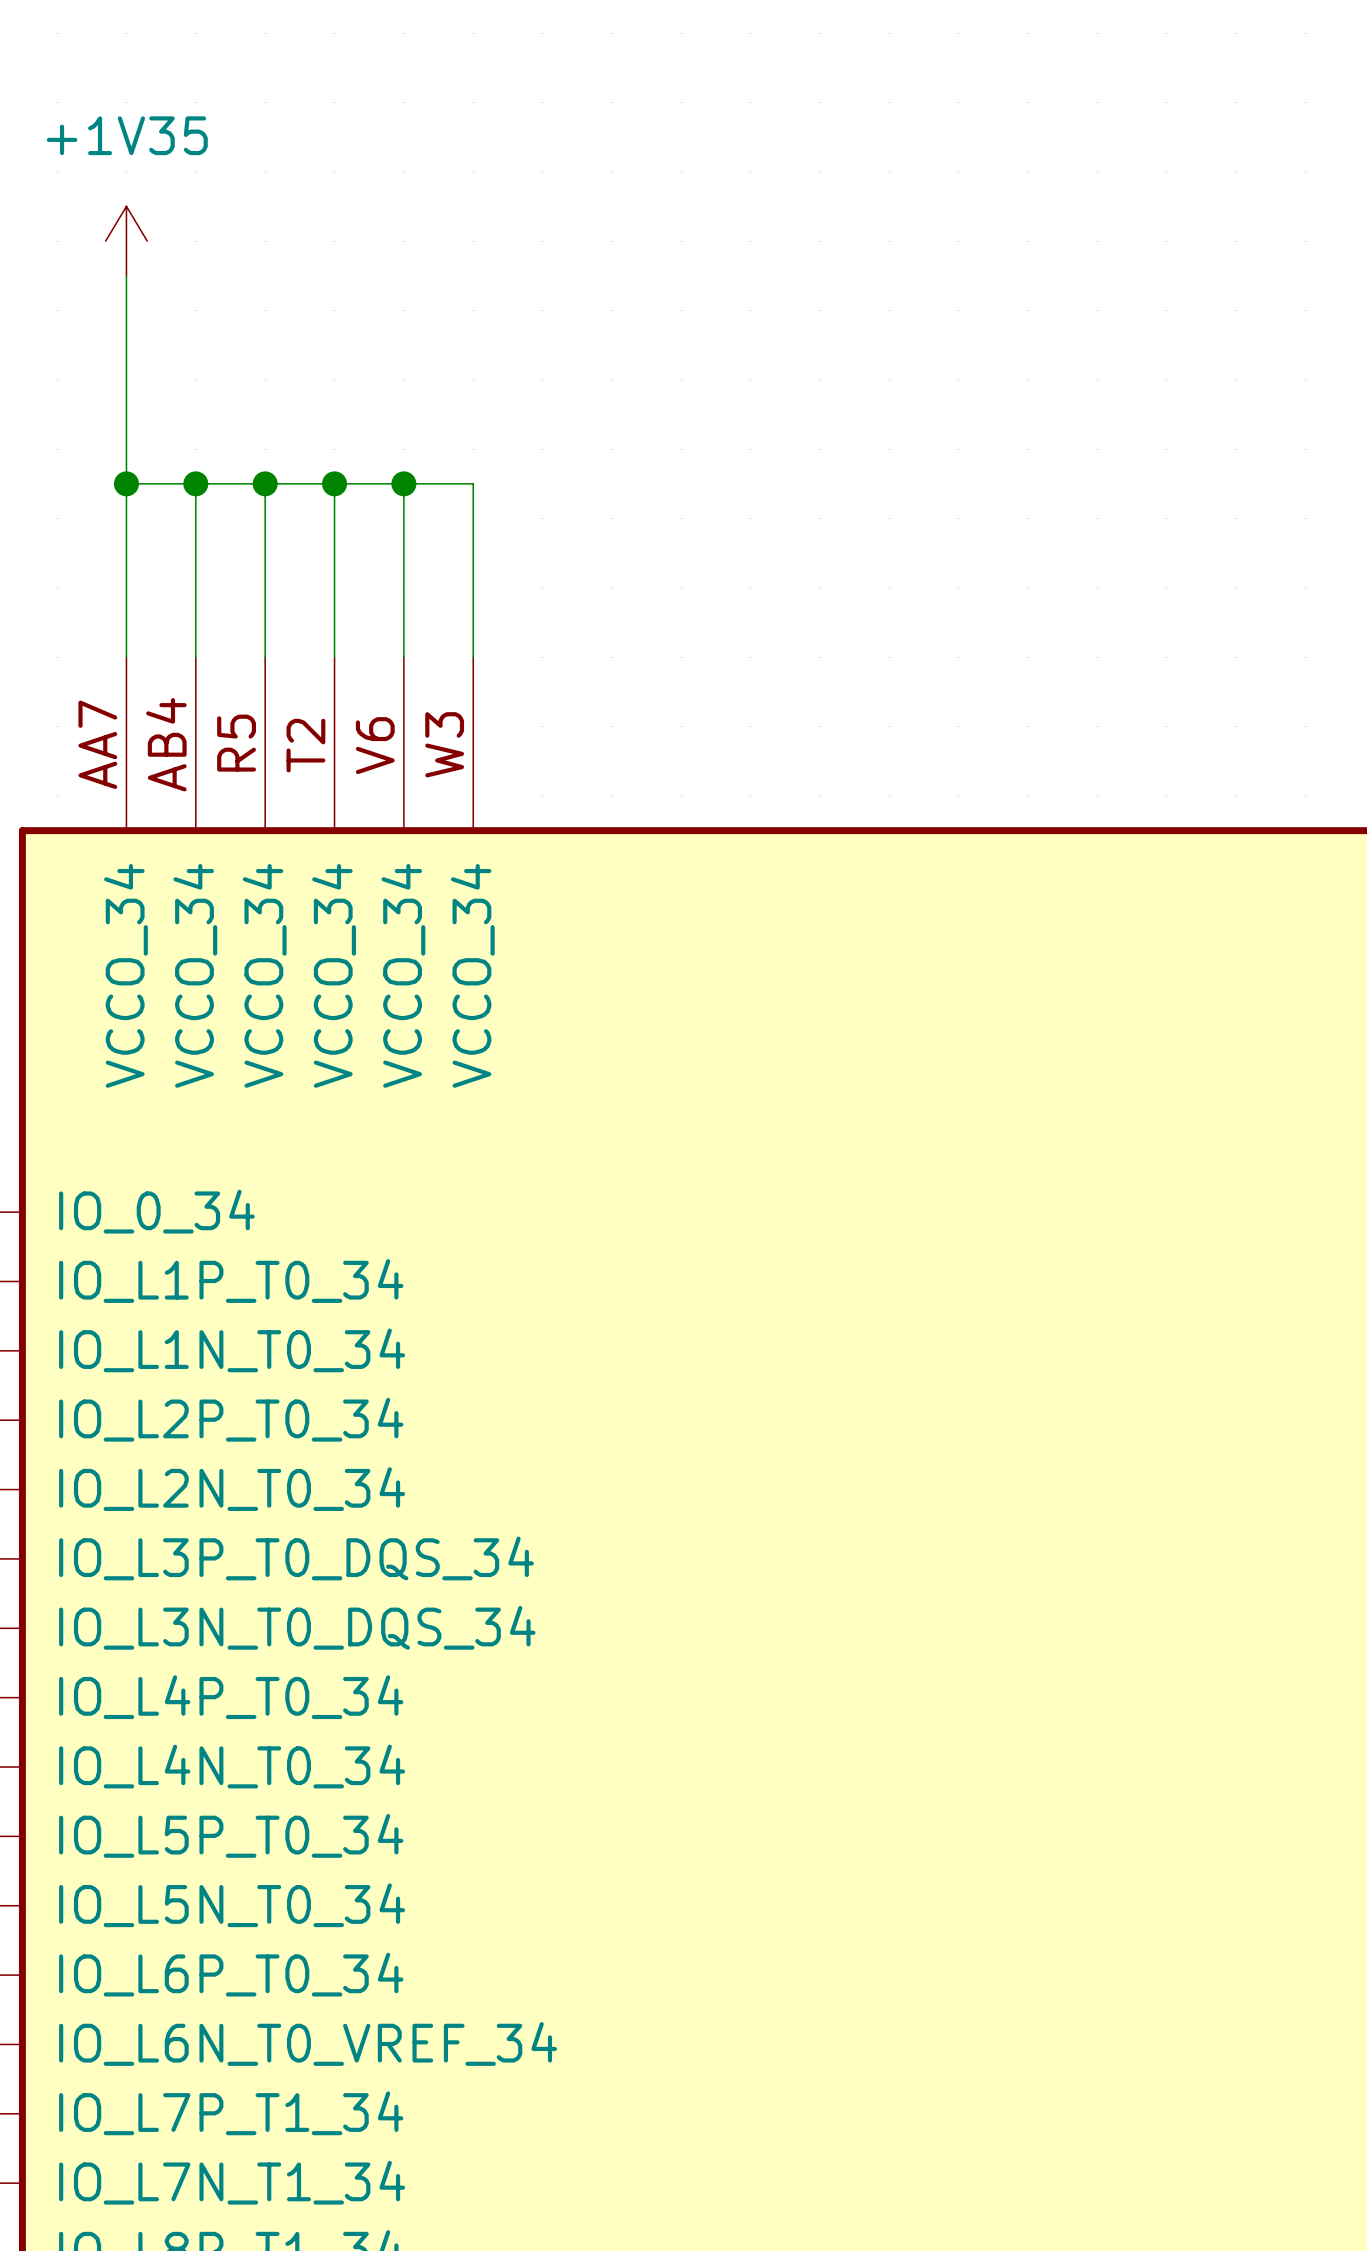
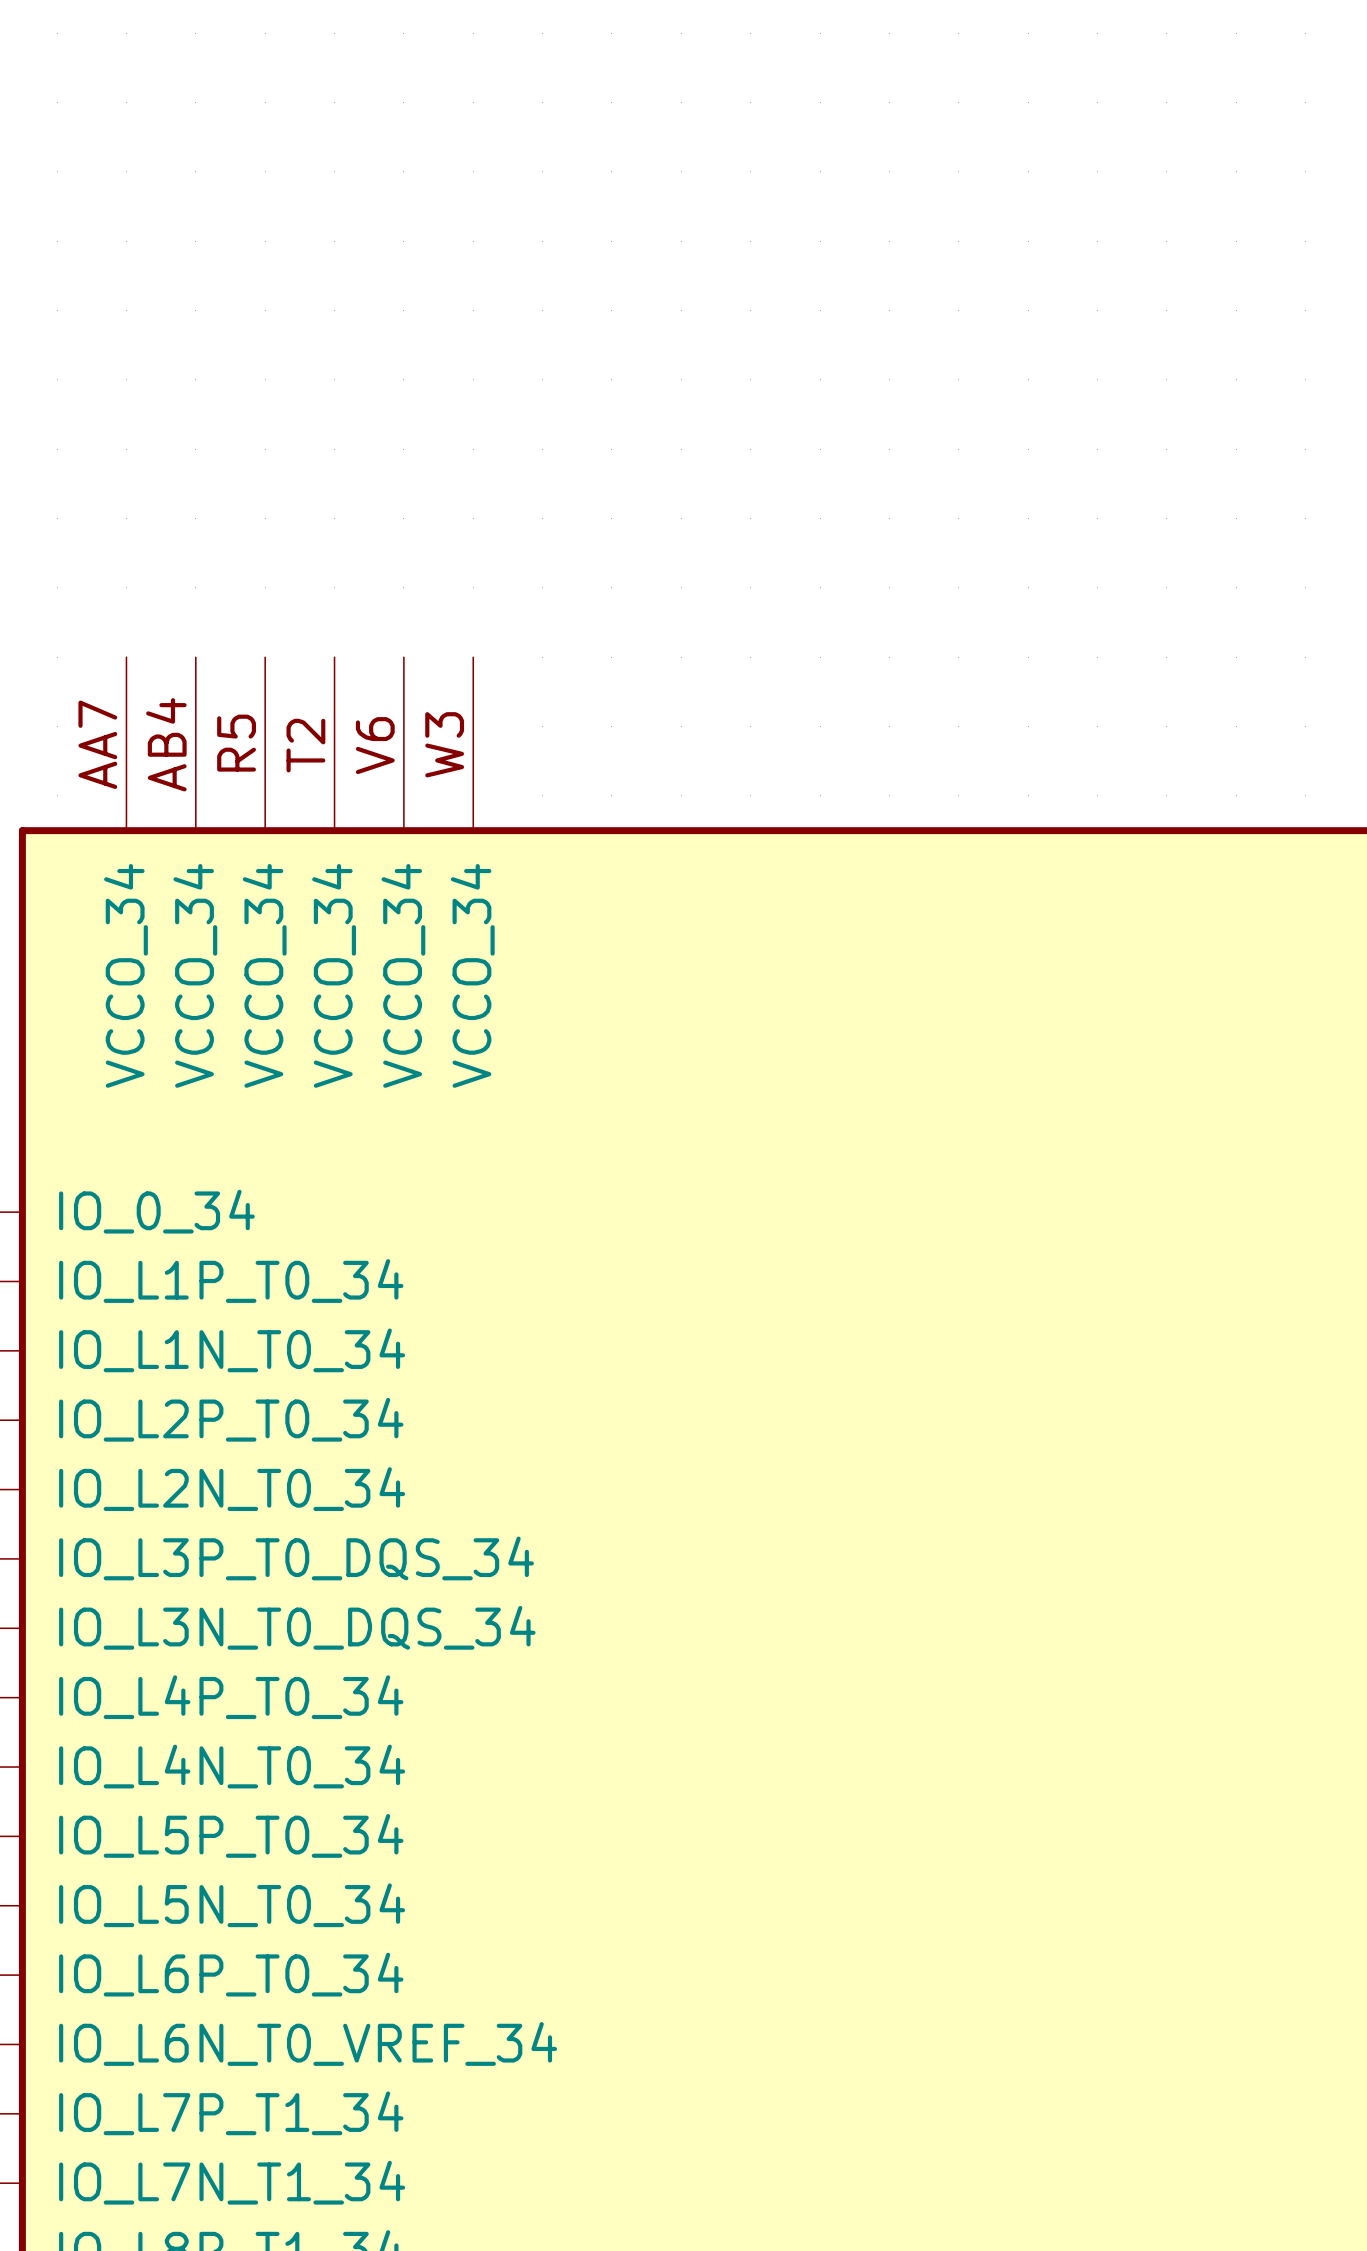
power symbol: +1V35 (126, 241) -> none
wire: (126, 275) (126, 657) -> none
wire: (126, 483) (473, 483) (473, 657) -> none
junction: (126, 483) -> none
wire: (195, 483) (195, 657) -> none
junction: (195, 483) -> none
wire: (265, 483) (265, 657) -> none
junction: (265, 483) -> none
wire: (334, 483) (334, 657) -> none
junction: (334, 483) -> none
wire: (403, 483) (403, 657) -> none
junction: (403, 483) -> none

